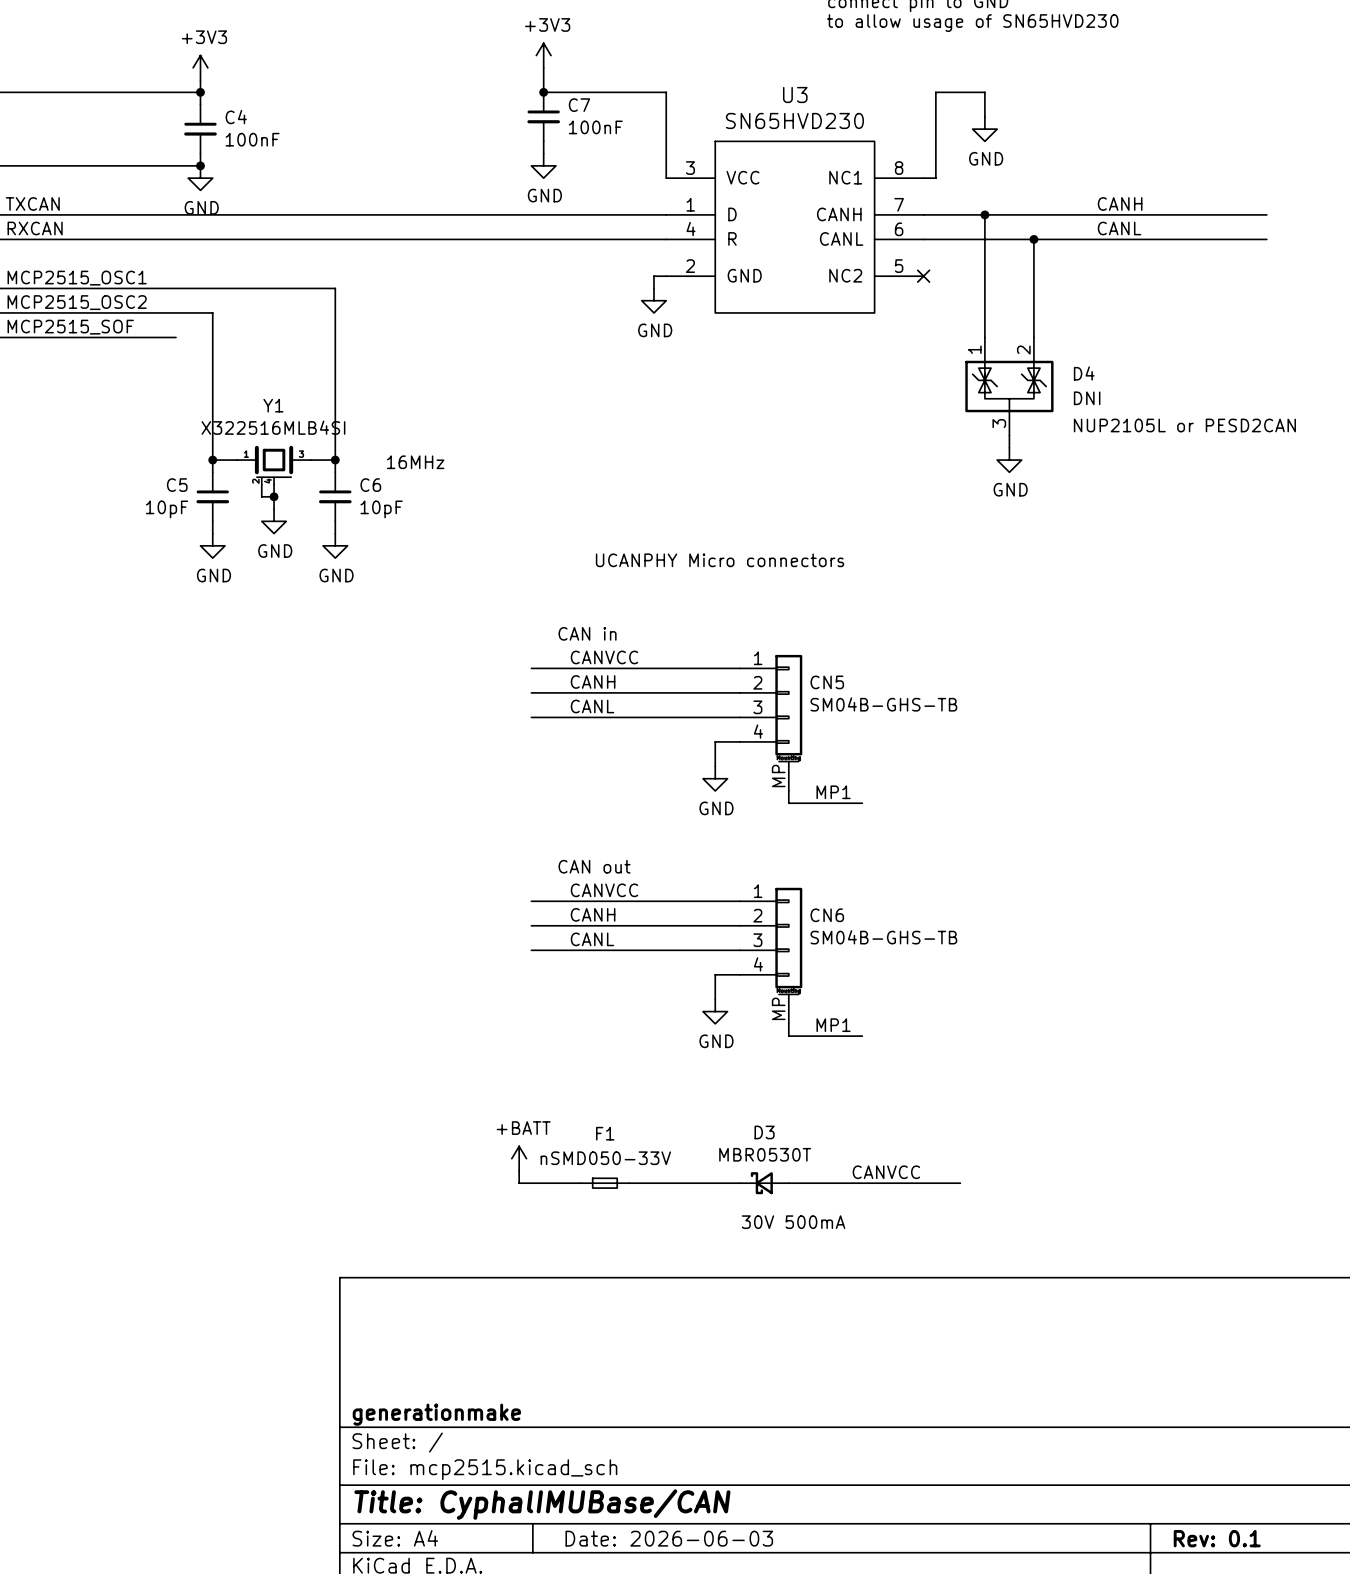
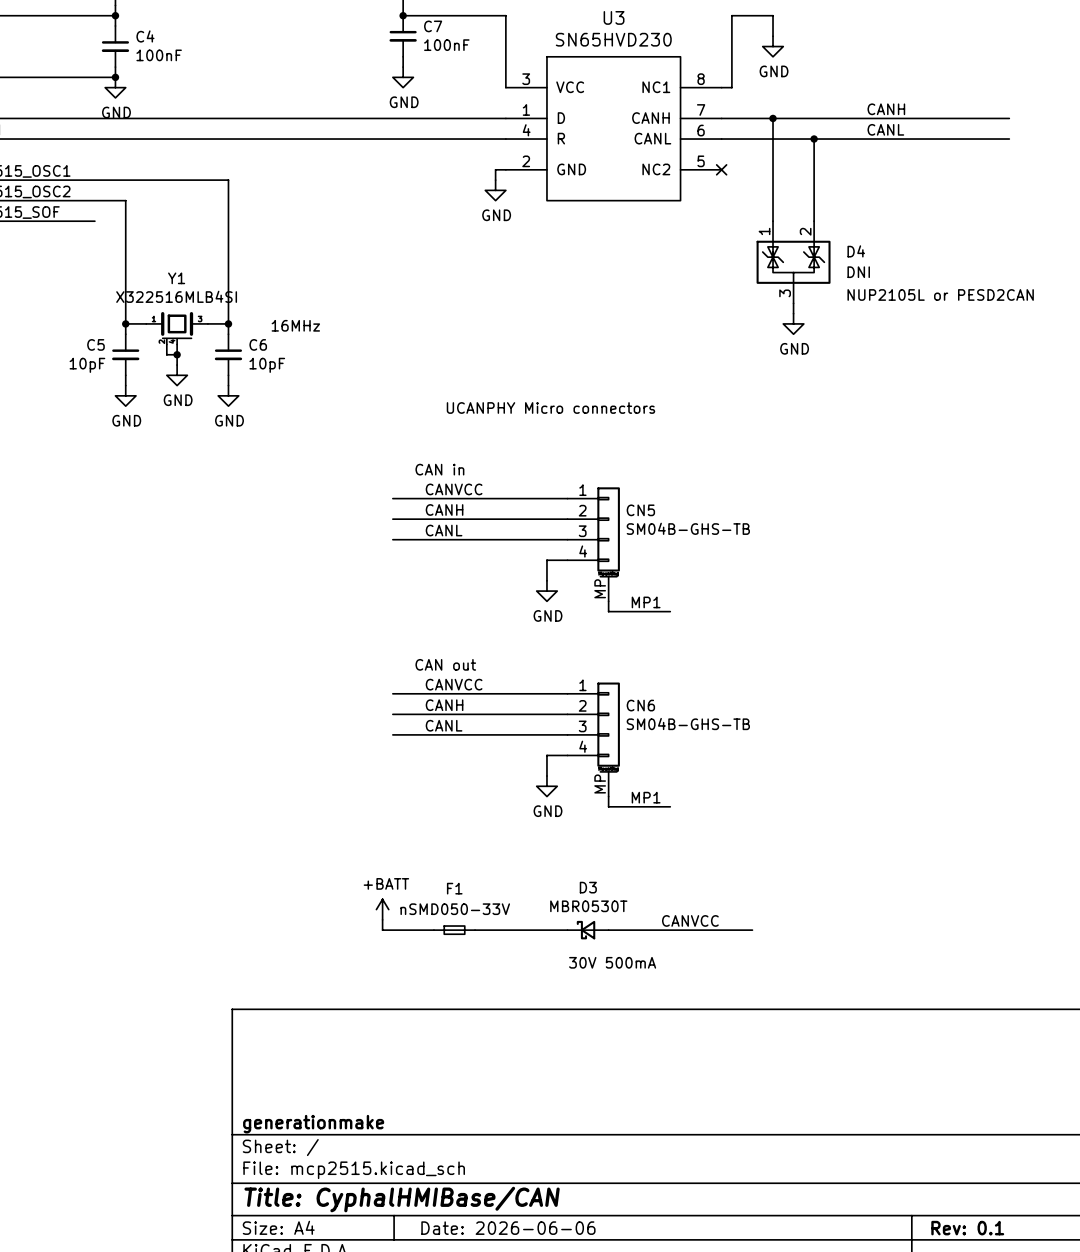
title block: Title: CyphalIMUBase/CAN (542, 1504) -> Title: CyphalHMIBase/CAN (402, 1199)
title block: Date: 2026-06-03 (669, 1538) -> Date: 2026-06-06 (508, 1228)

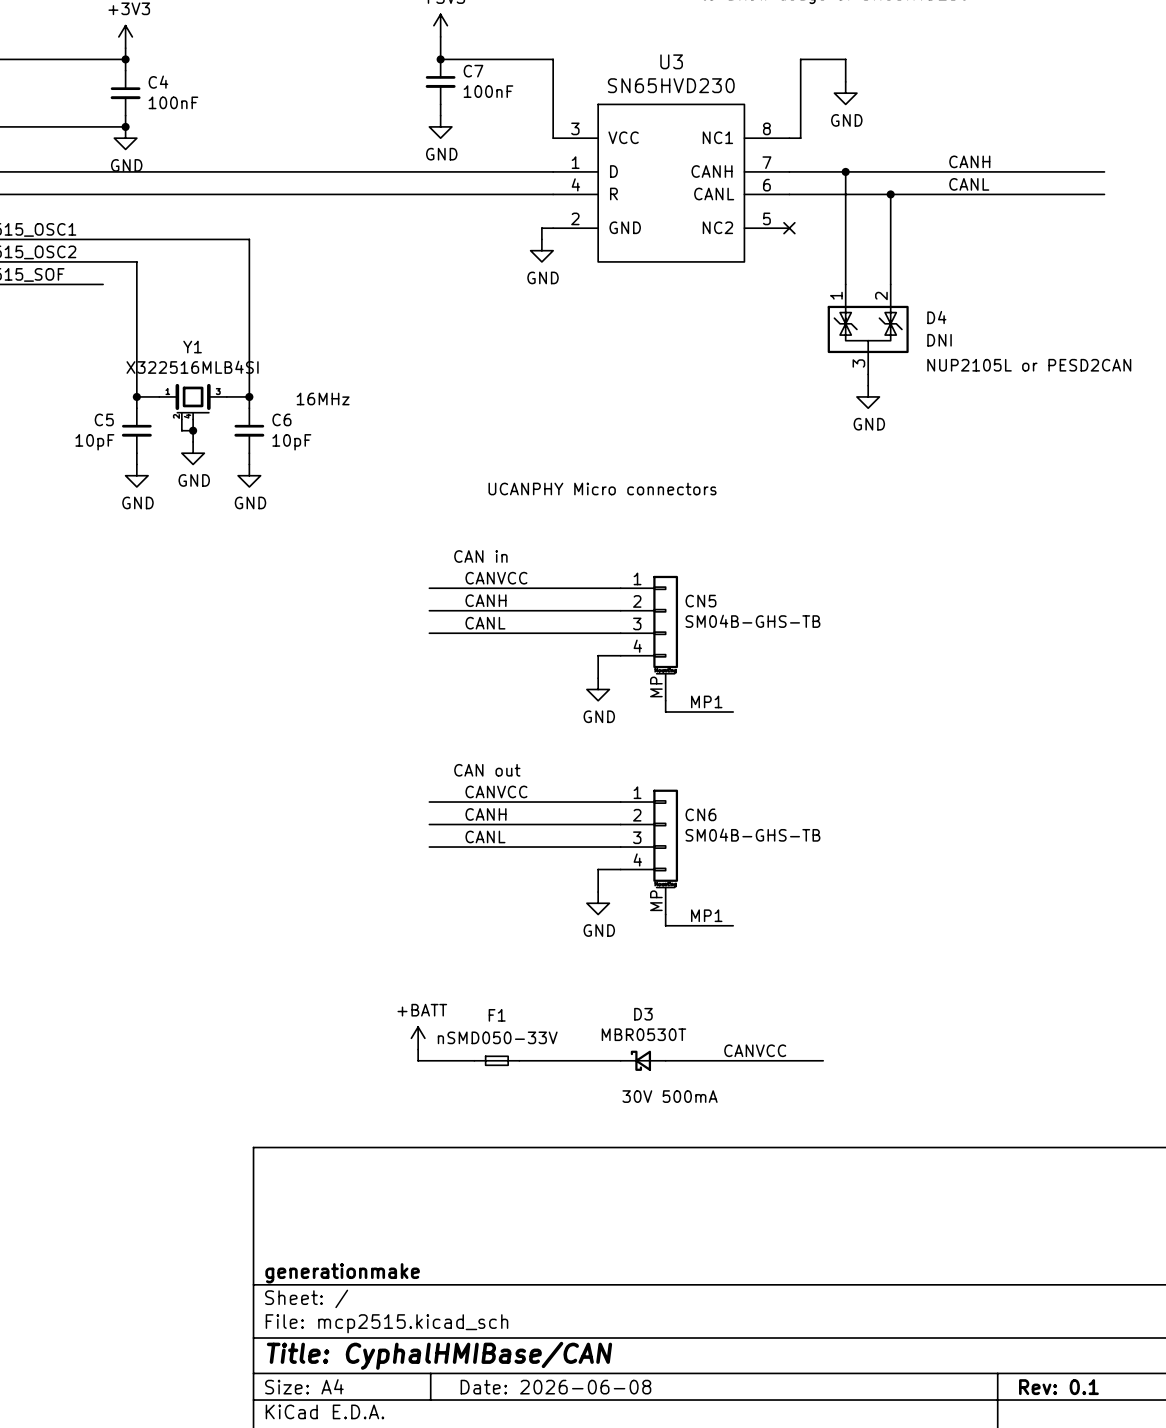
title block: Date: 2026-06-06 (508, 1228) -> Date: 2026-06-08 (555, 1387)

